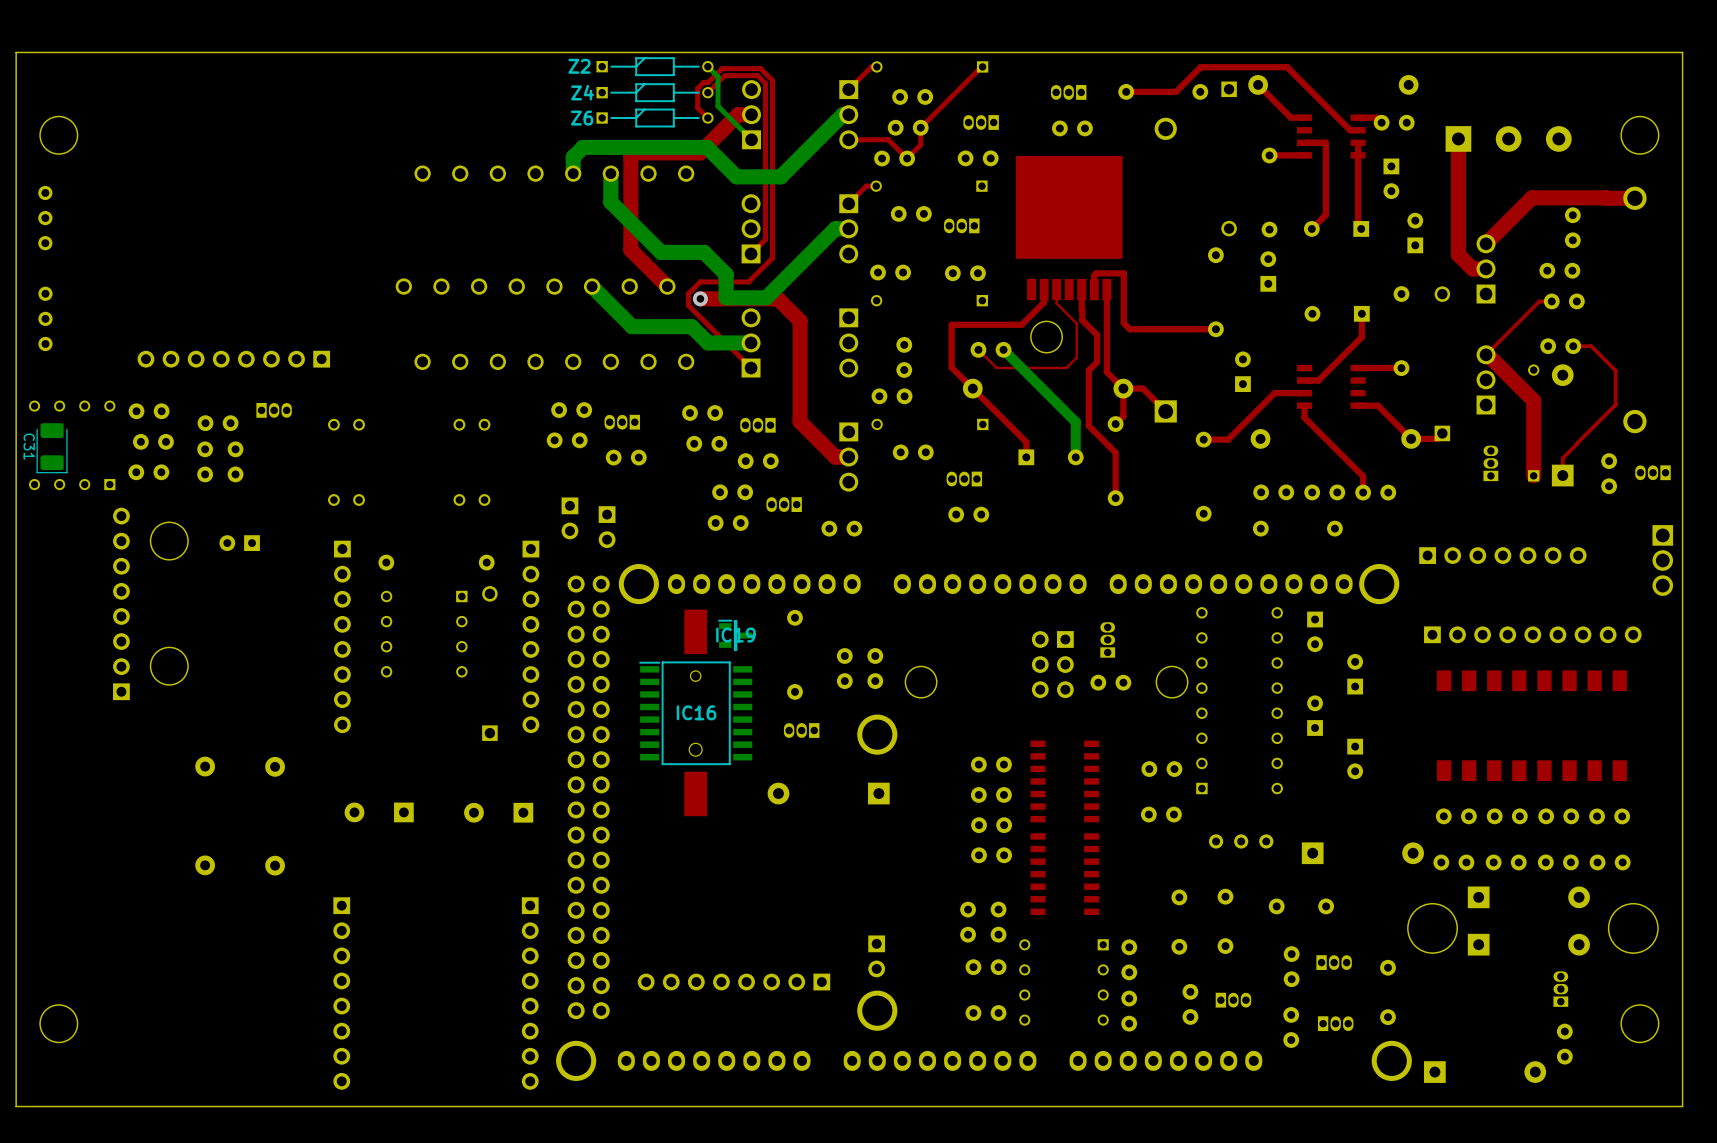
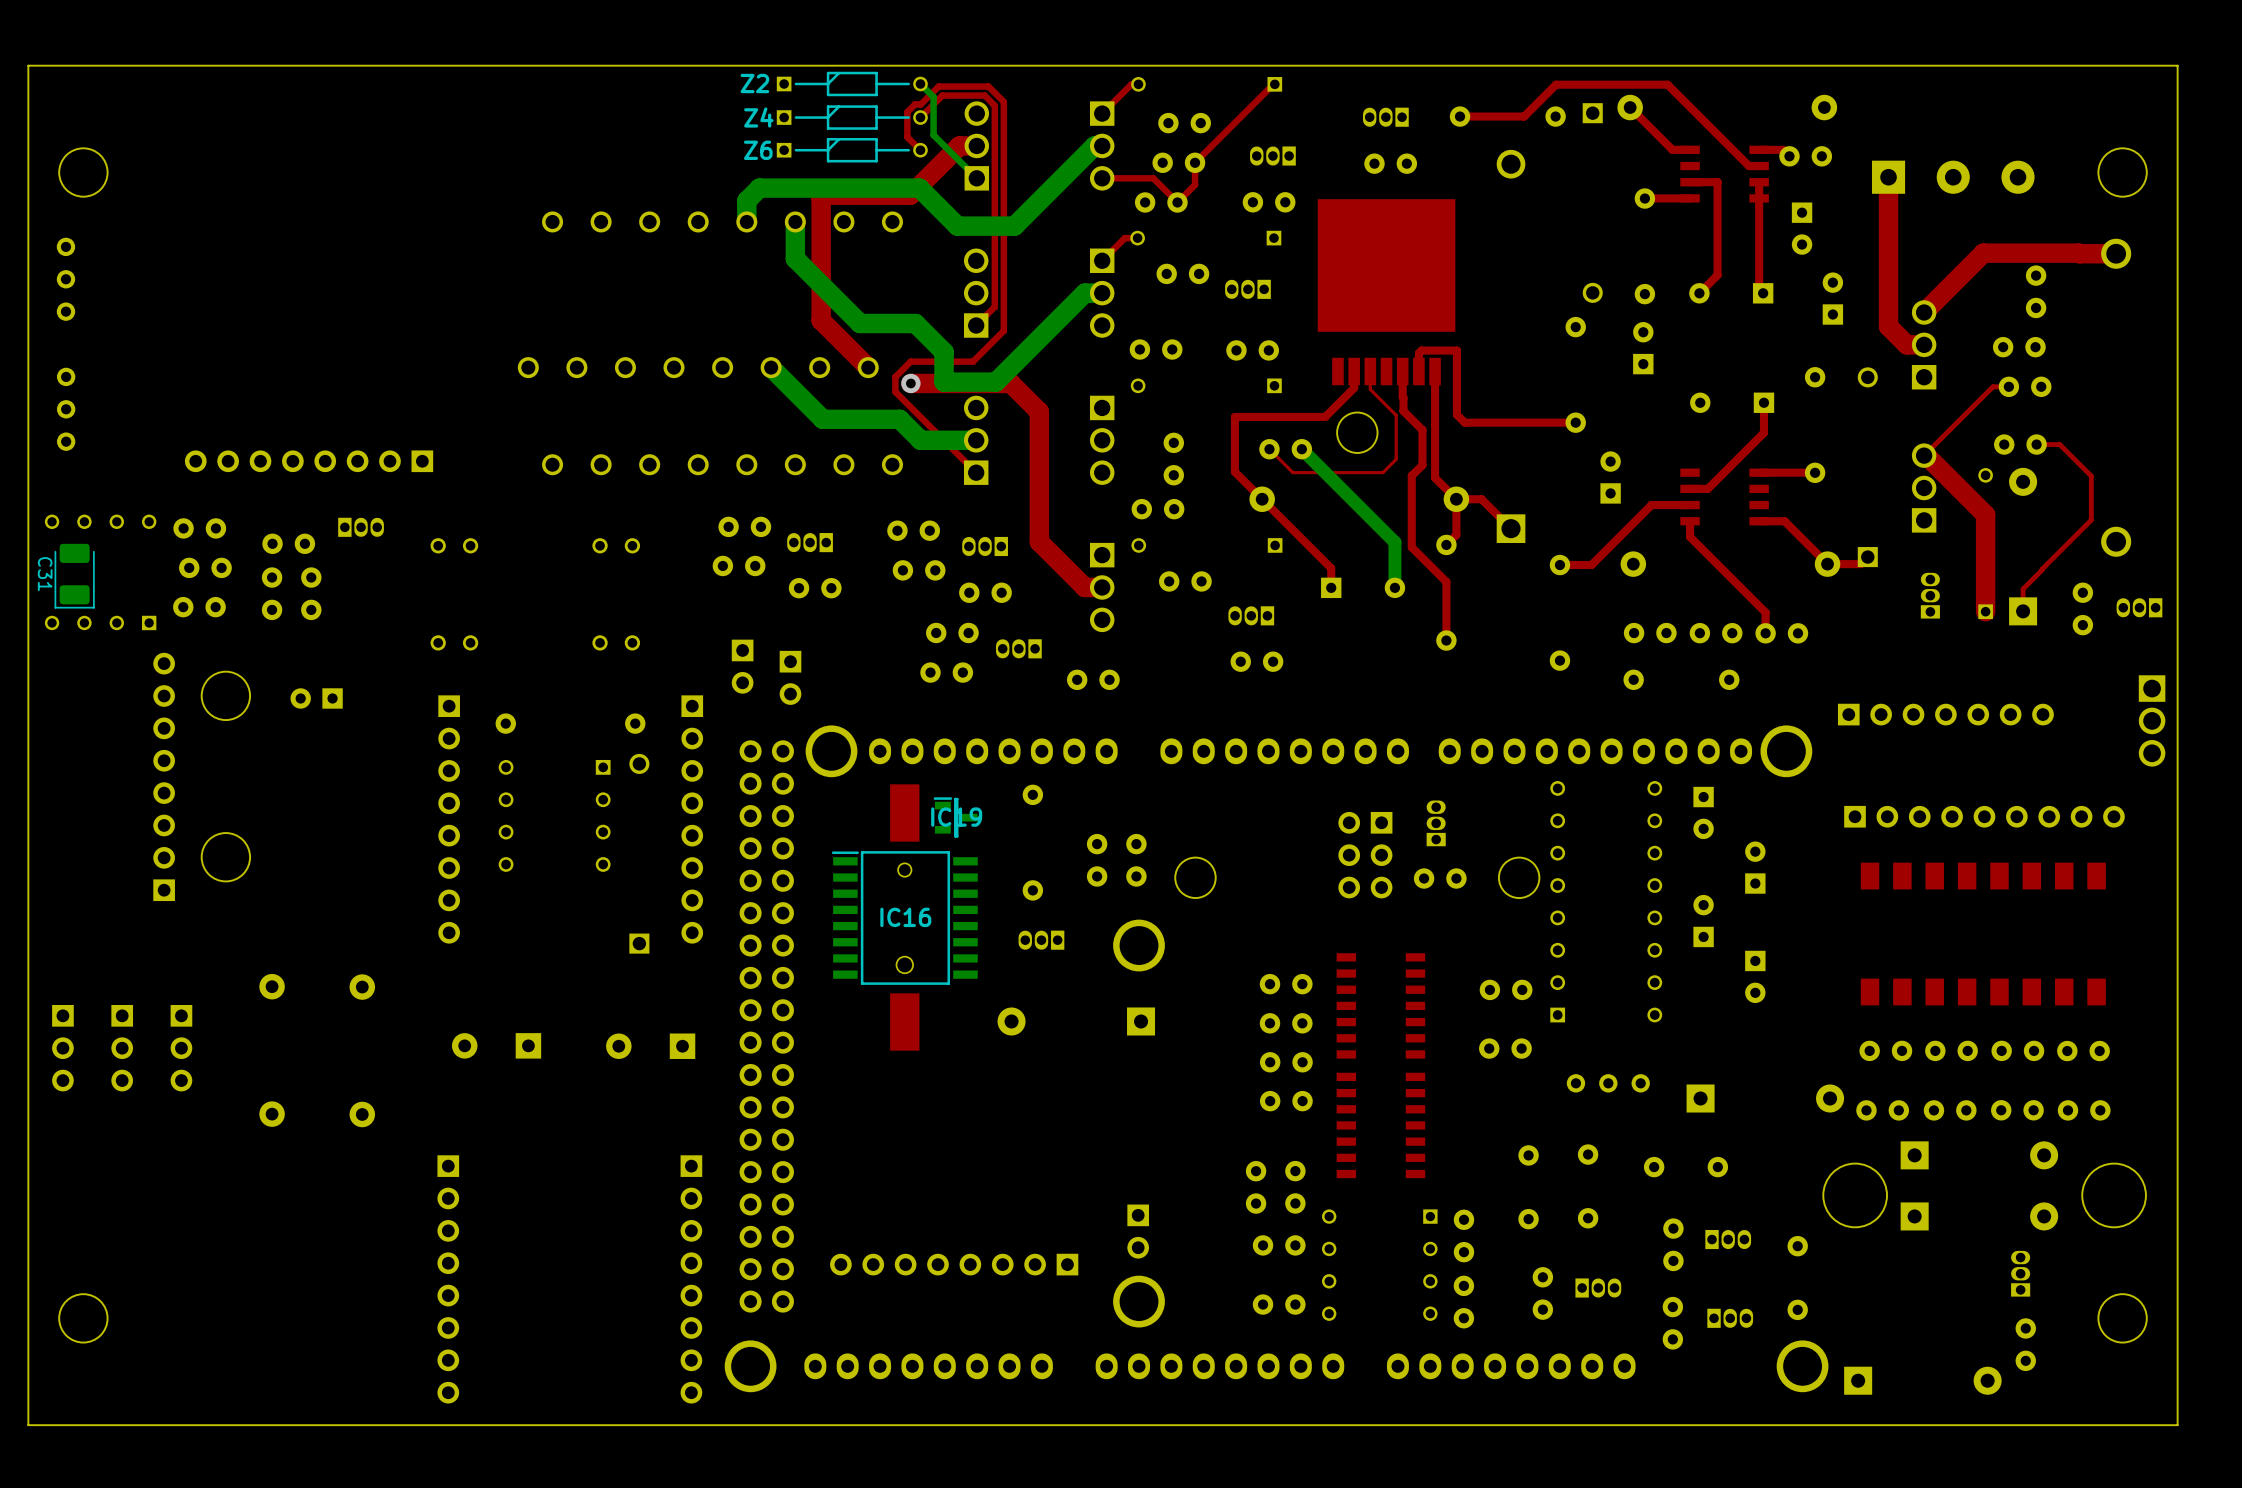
part: none -> (62, 1048)
part: none -> (122, 1048)
part: none -> (181, 1048)

